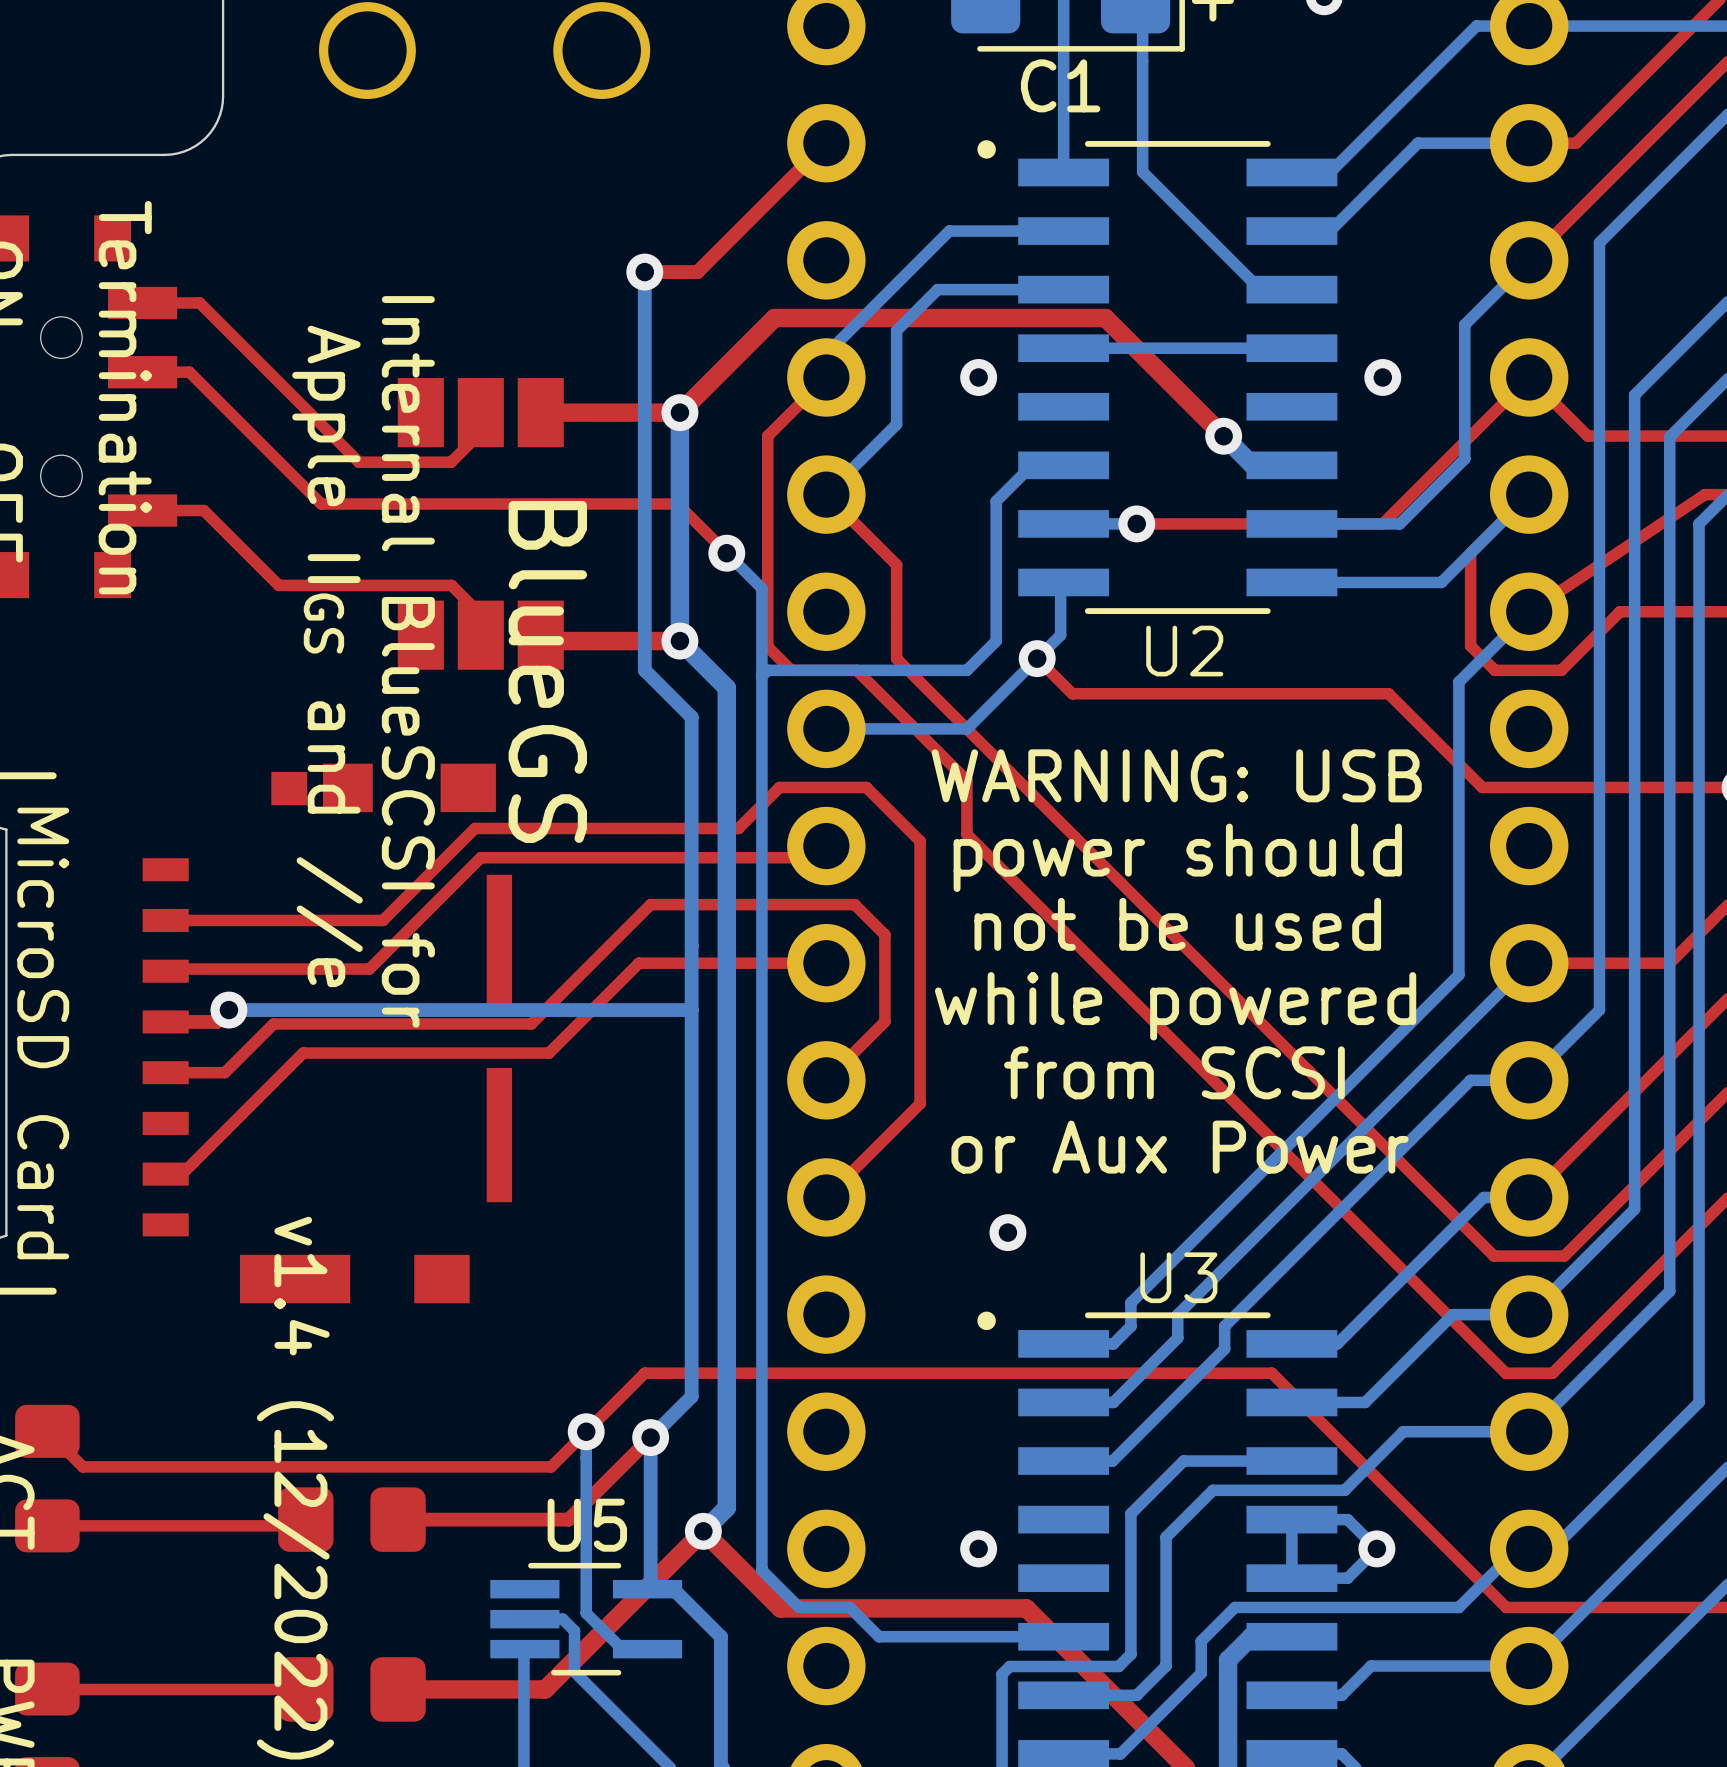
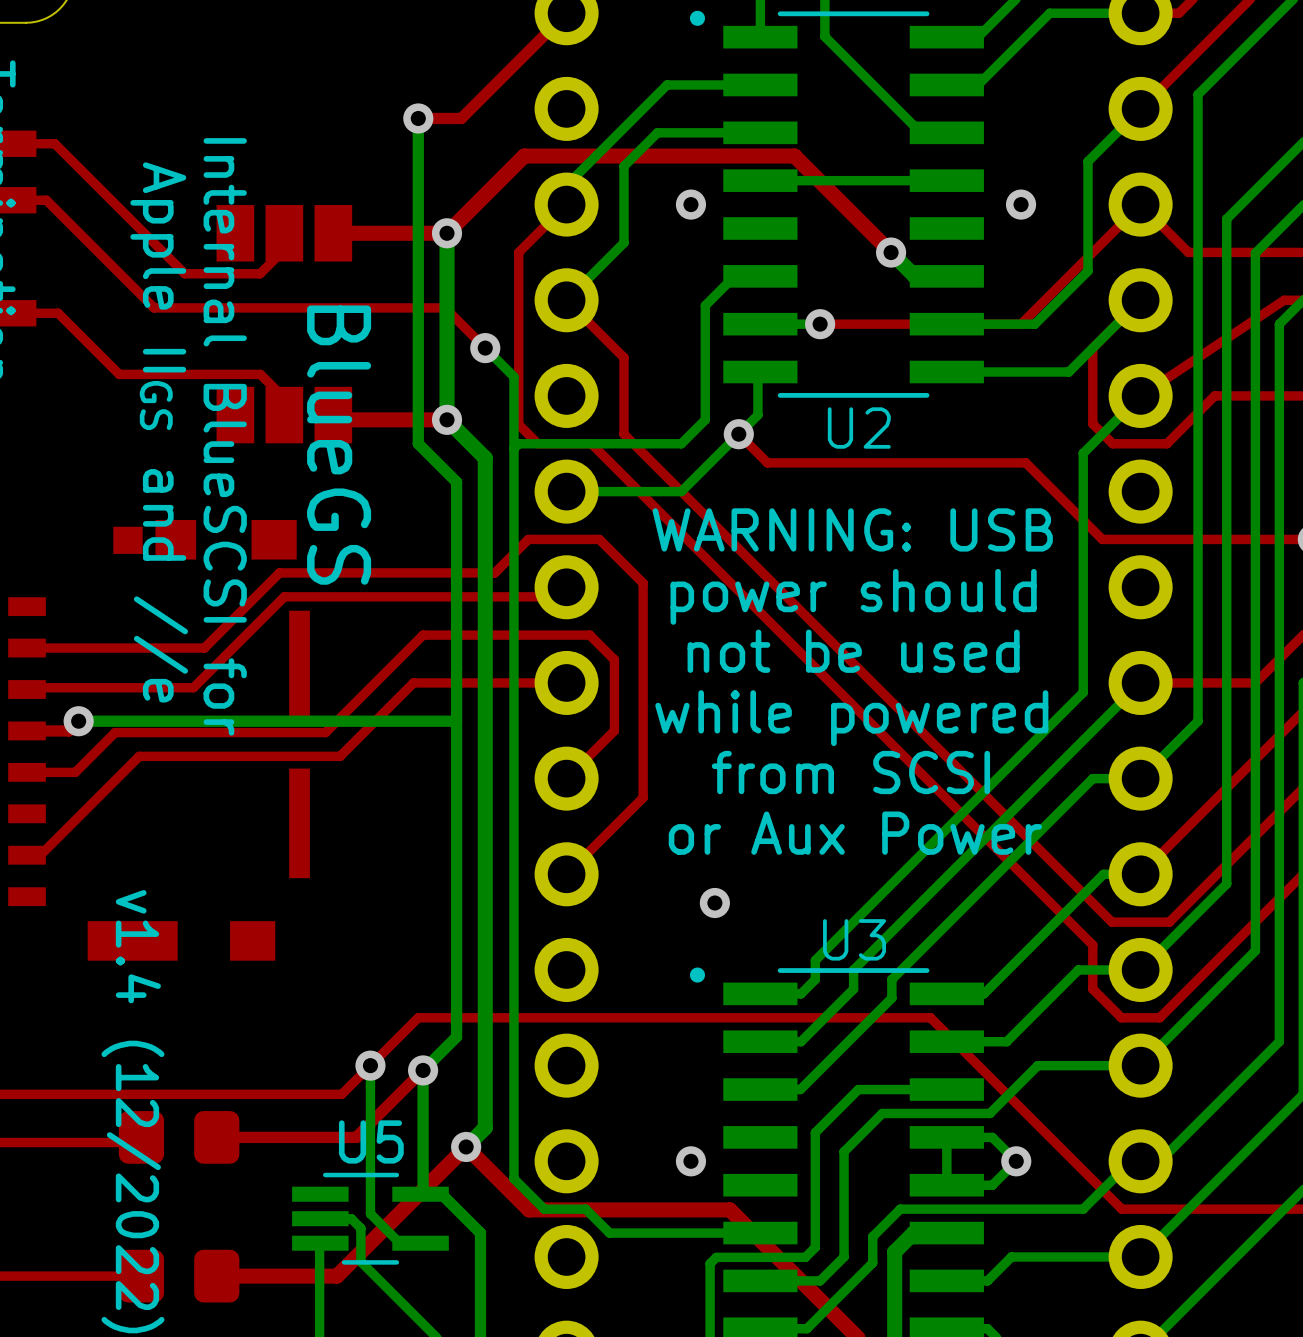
top track: (966, 780) (966, 834) (1470, 1338) -> (681, 533) (1092, 945) (1092, 989)

